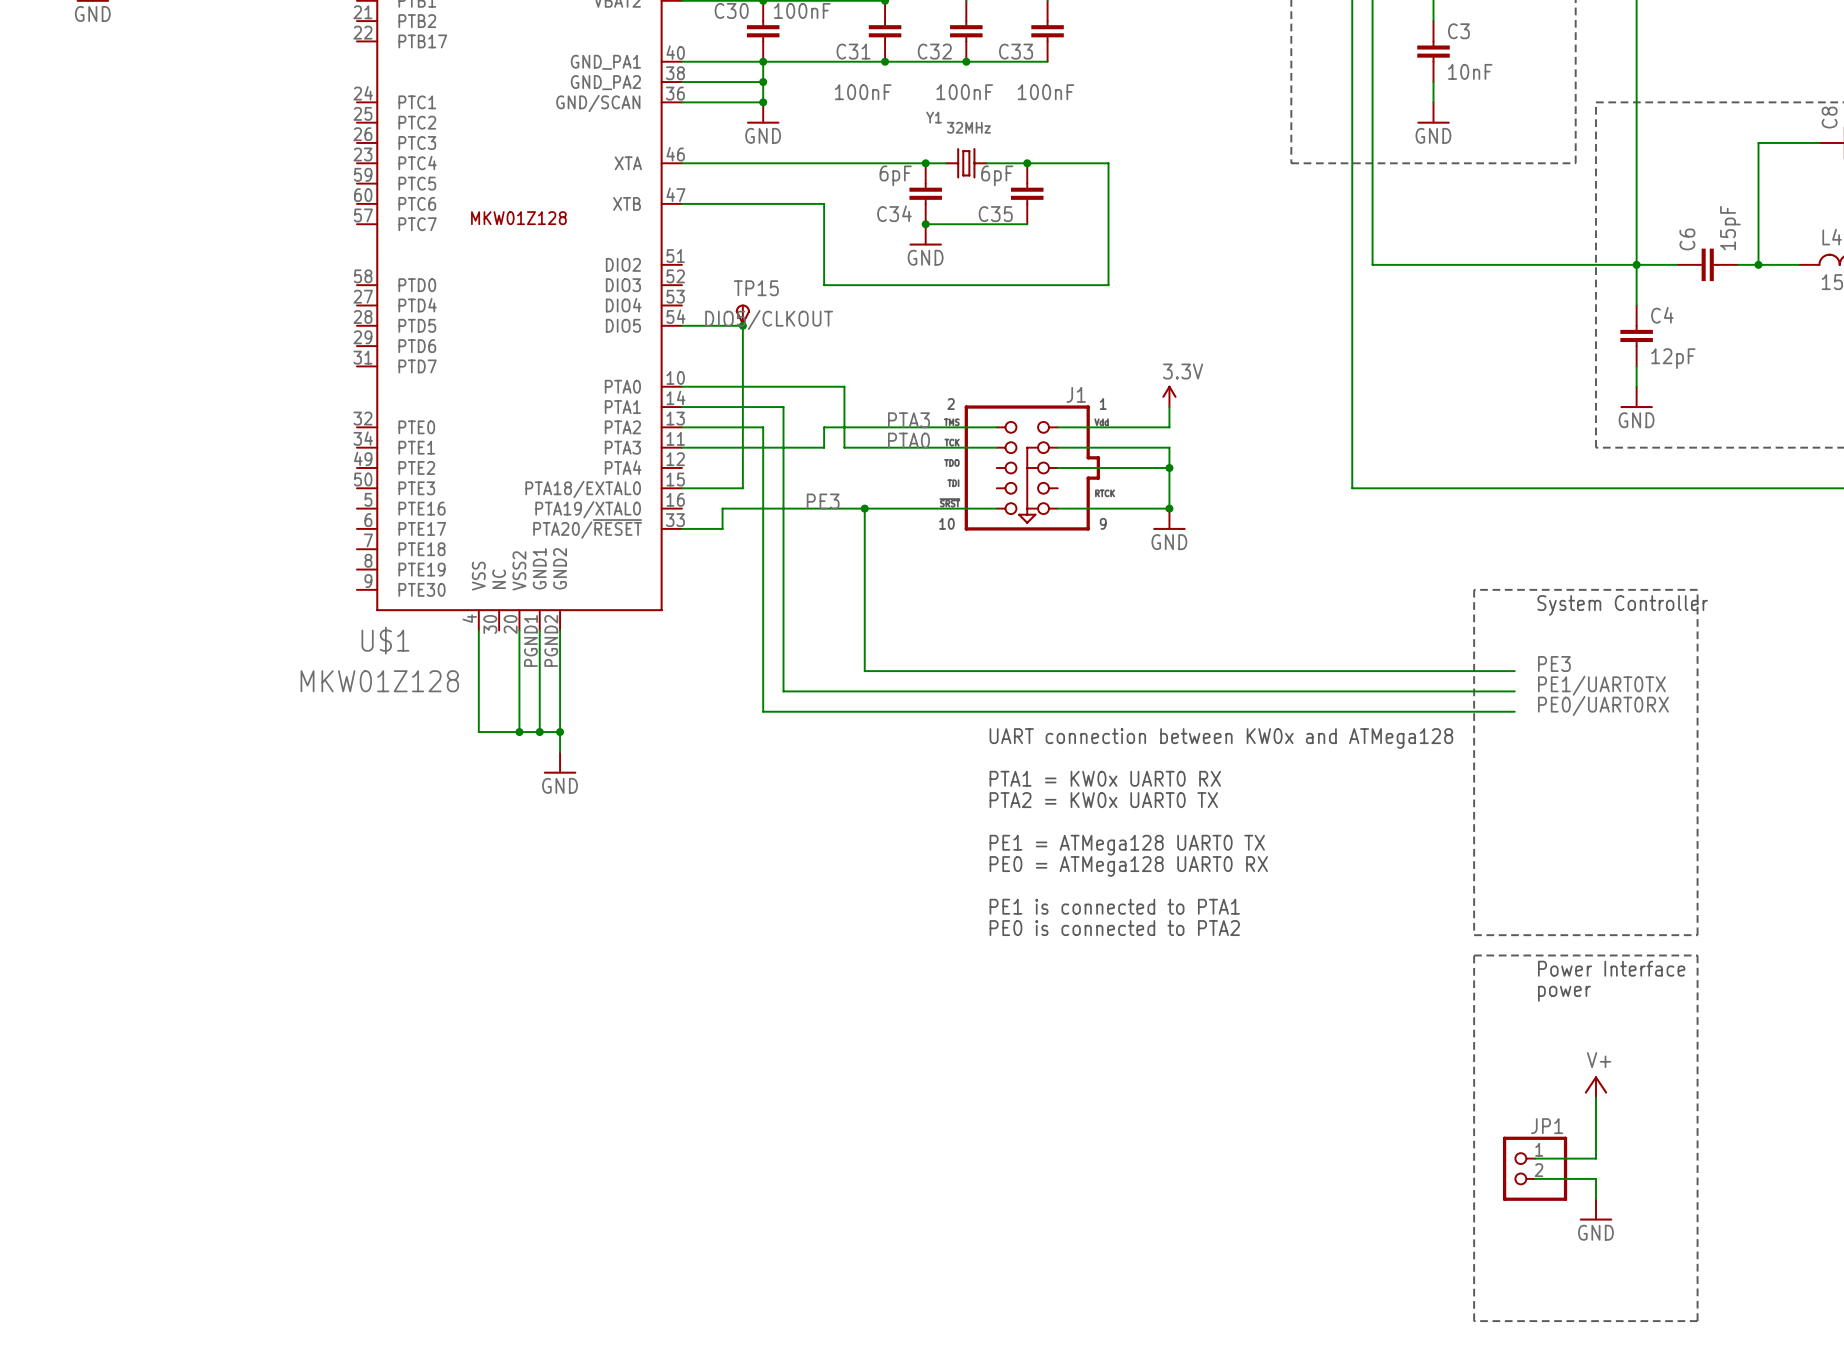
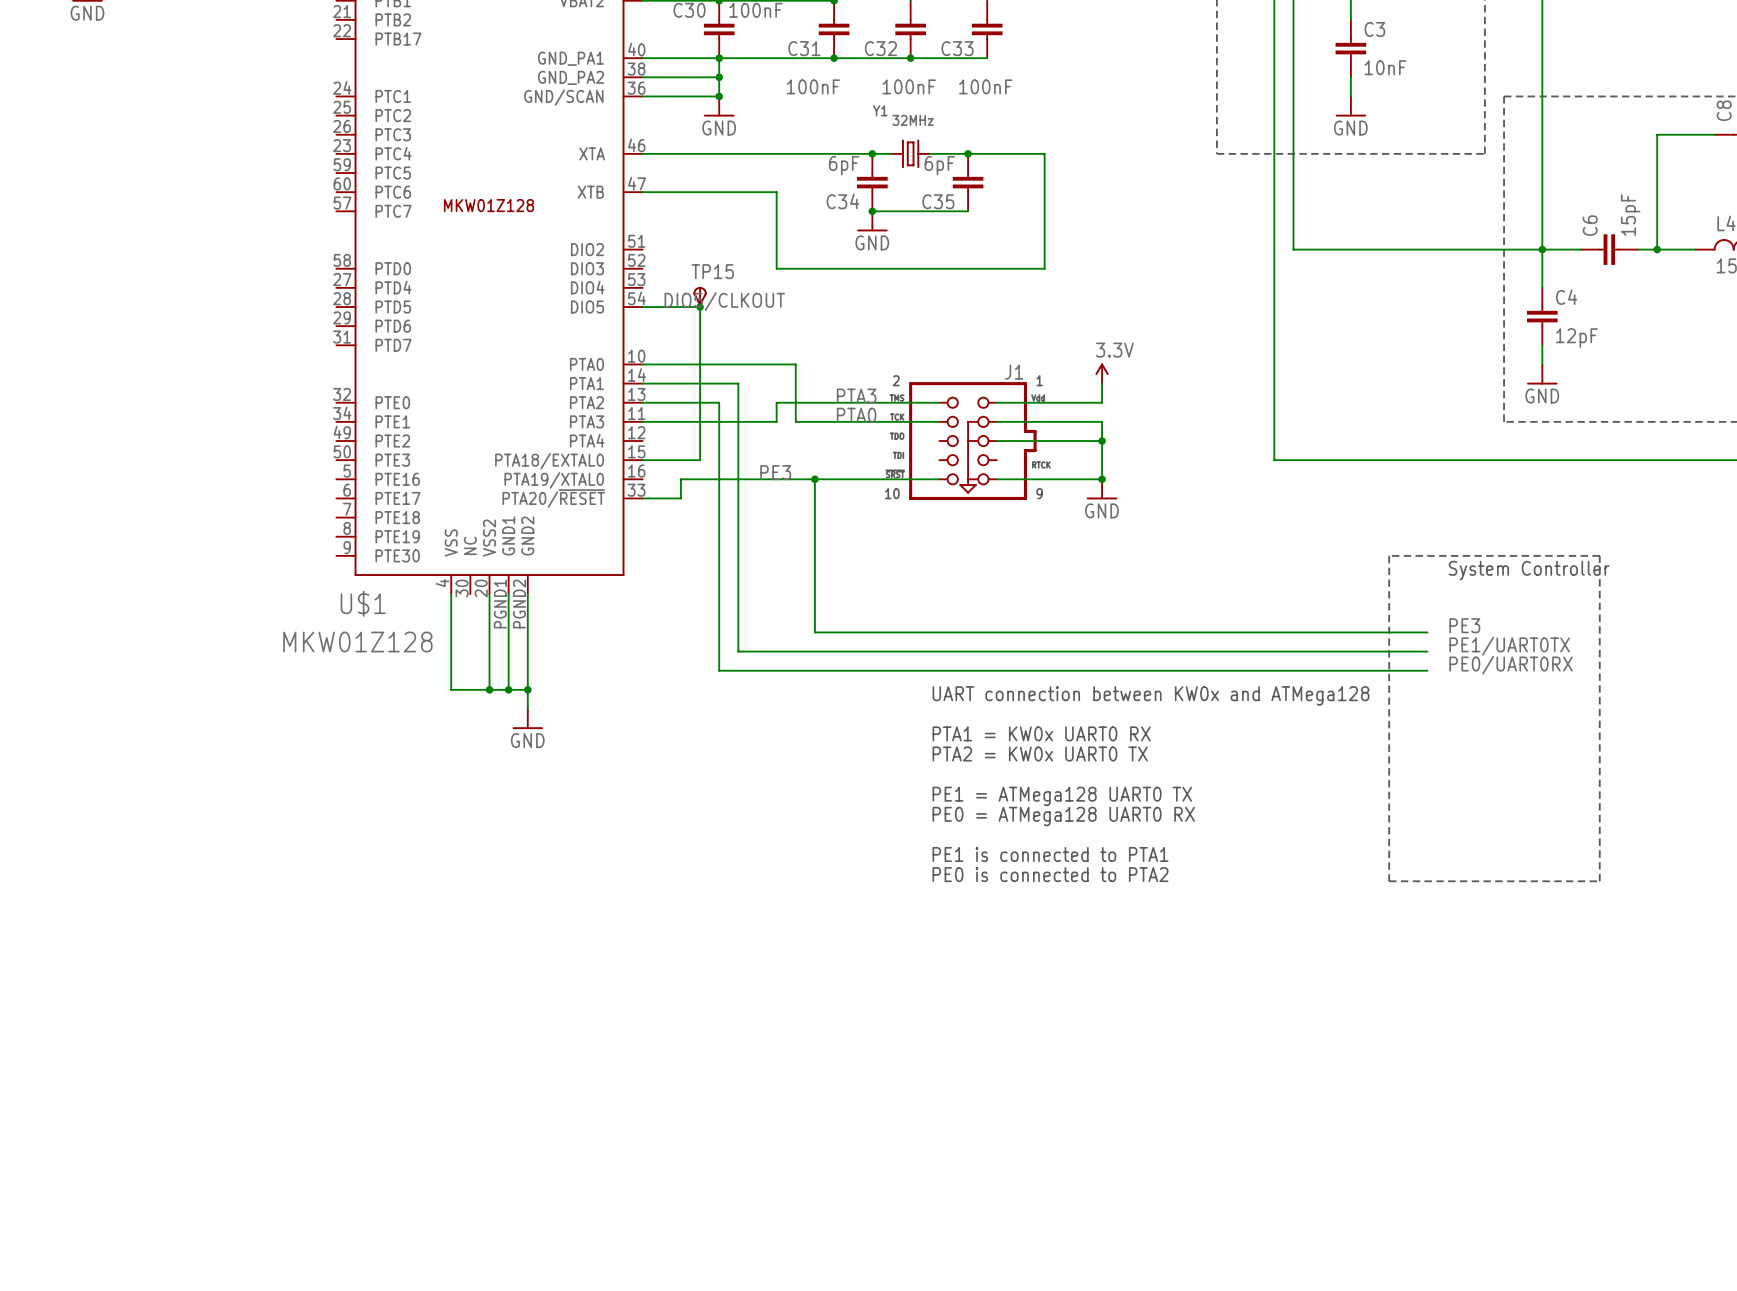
line: (1474, 955) (1697, 955) (1697, 1321) (1474, 1321) (1474, 955) -> none
text: Power Interface (1611, 968) -> none
text: power (1564, 993) -> none
power symbol: V+ (1596, 1087) -> none
wire: (1596, 1097) (1596, 1158) (1535, 1158) -> none
JP1: (1535, 1168) -> none
wire: (1535, 1178) (1596, 1178) (1596, 1199) -> none
power symbol: GND (1596, 1209) -> none

